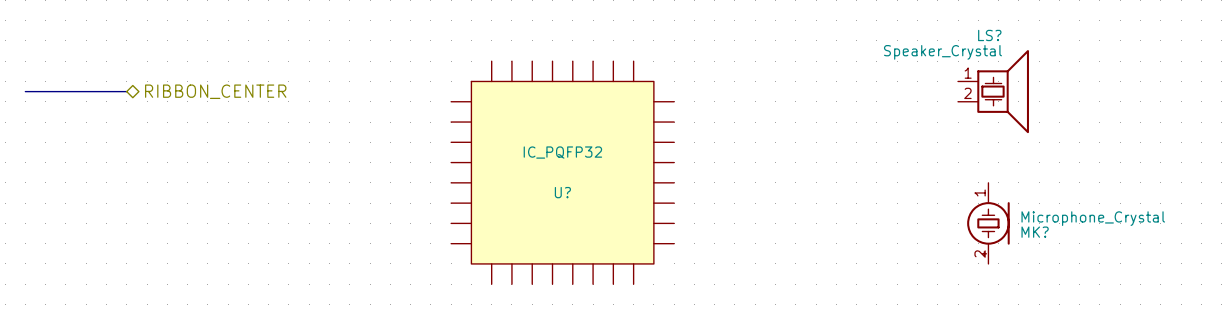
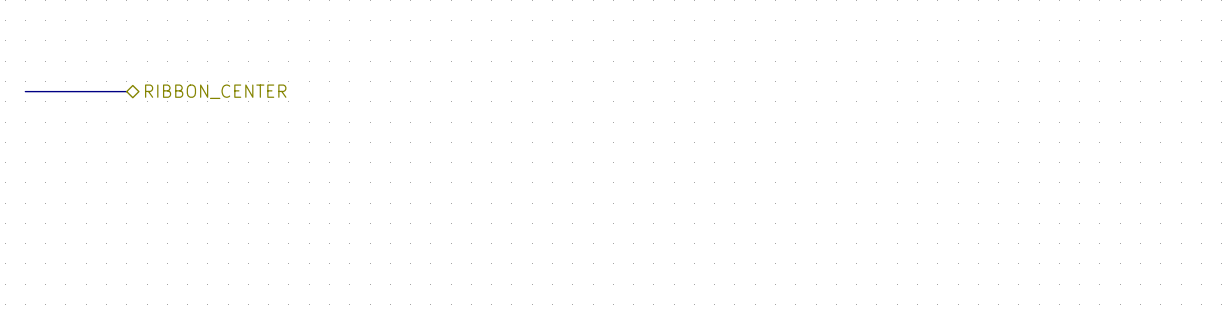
LS?: Speaker_Crystal (993, 91) -> none
U?: IC_PQFP32 (562, 172) -> none
MK?: Microphone_Crystal (988, 223) -> none

